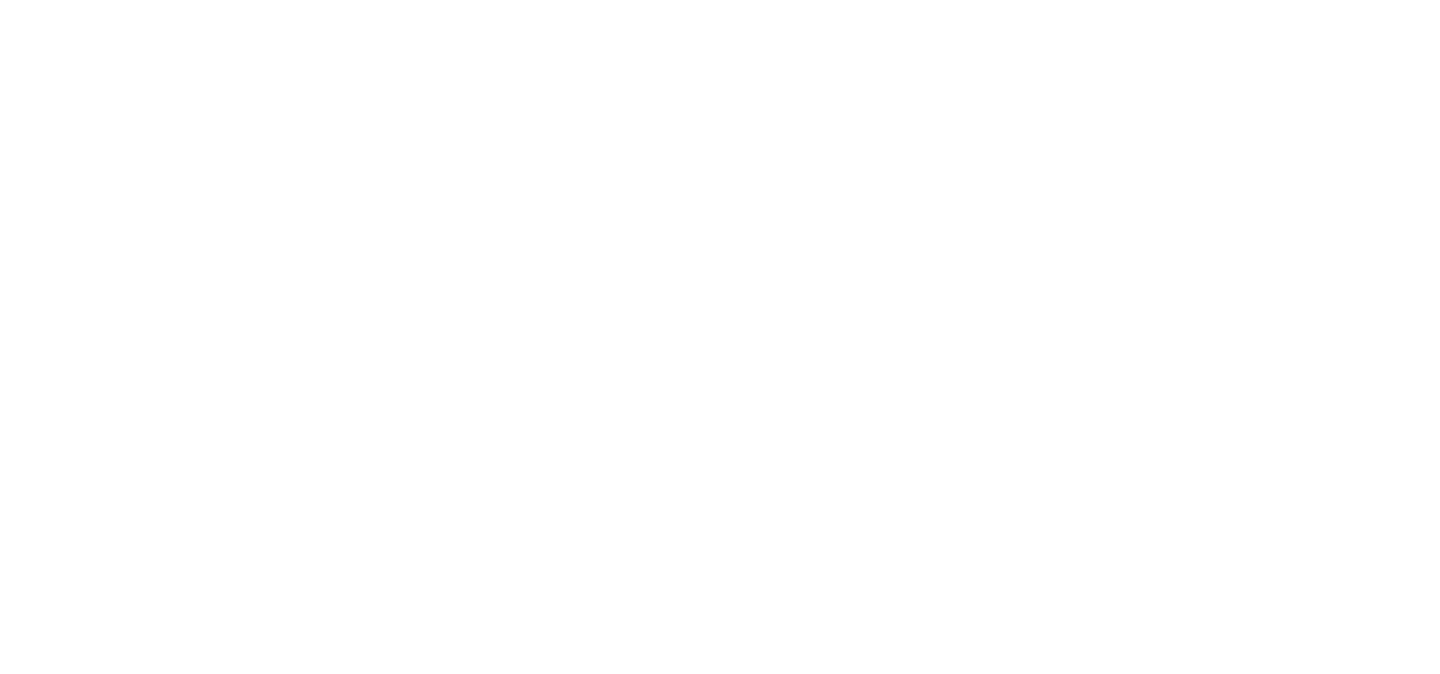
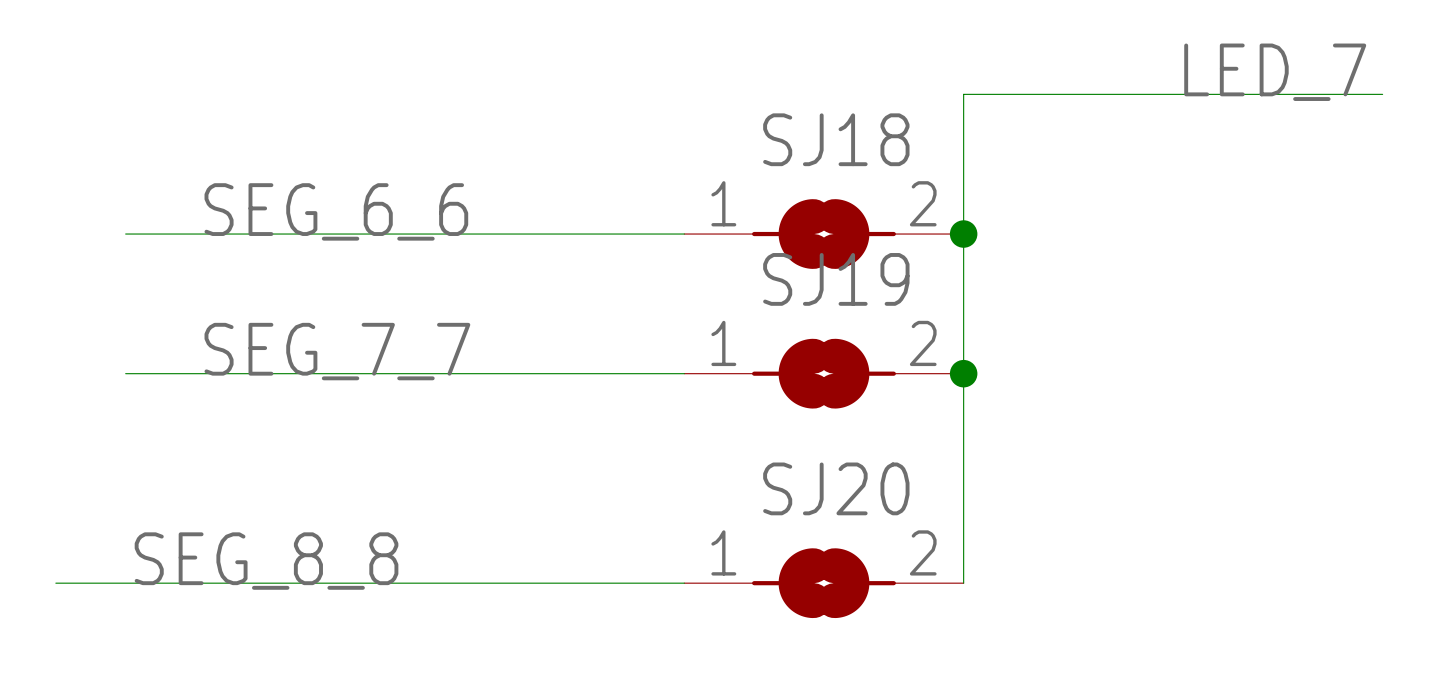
label: none -> LED_7 (1275, 72)
wire: none -> (1382, 94) (963, 94) (963, 583)
label: none -> SEG_6_6 (336, 211)
wire: none -> (125, 234) (684, 234)
SJ18: none -> (823, 234)
junction: none -> (963, 234)
label: none -> SEG_7_7 (337, 351)
wire: none -> (125, 373) (684, 373)
SJ19: none -> (823, 373)
junction: none -> (963, 373)
label: none -> SEG_8_8 (266, 561)
wire: none -> (55, 583) (684, 583)
SJ20: none -> (823, 583)

